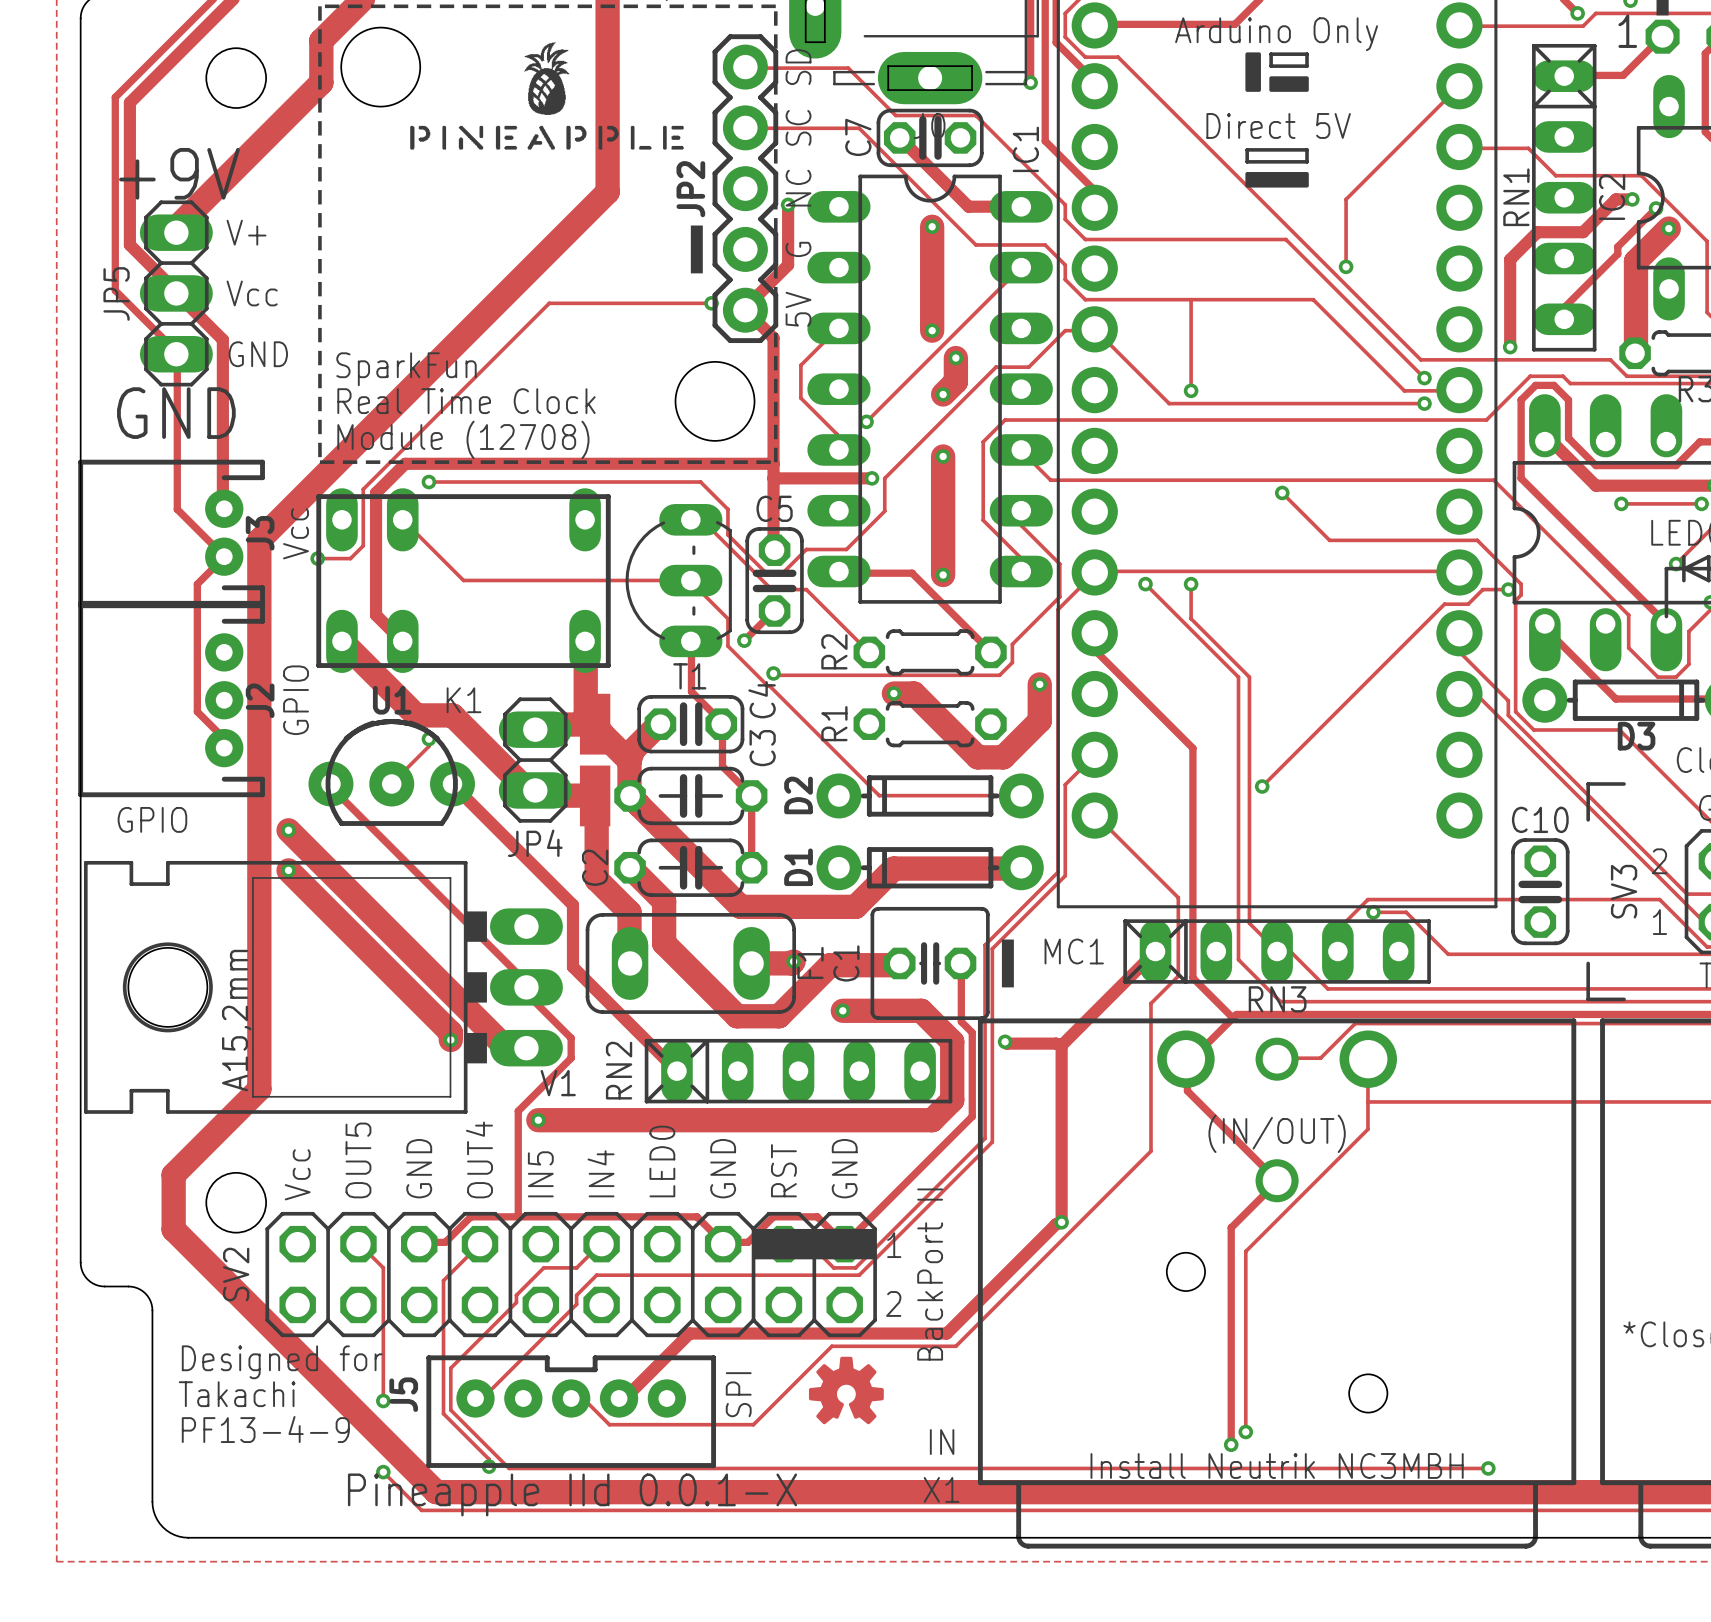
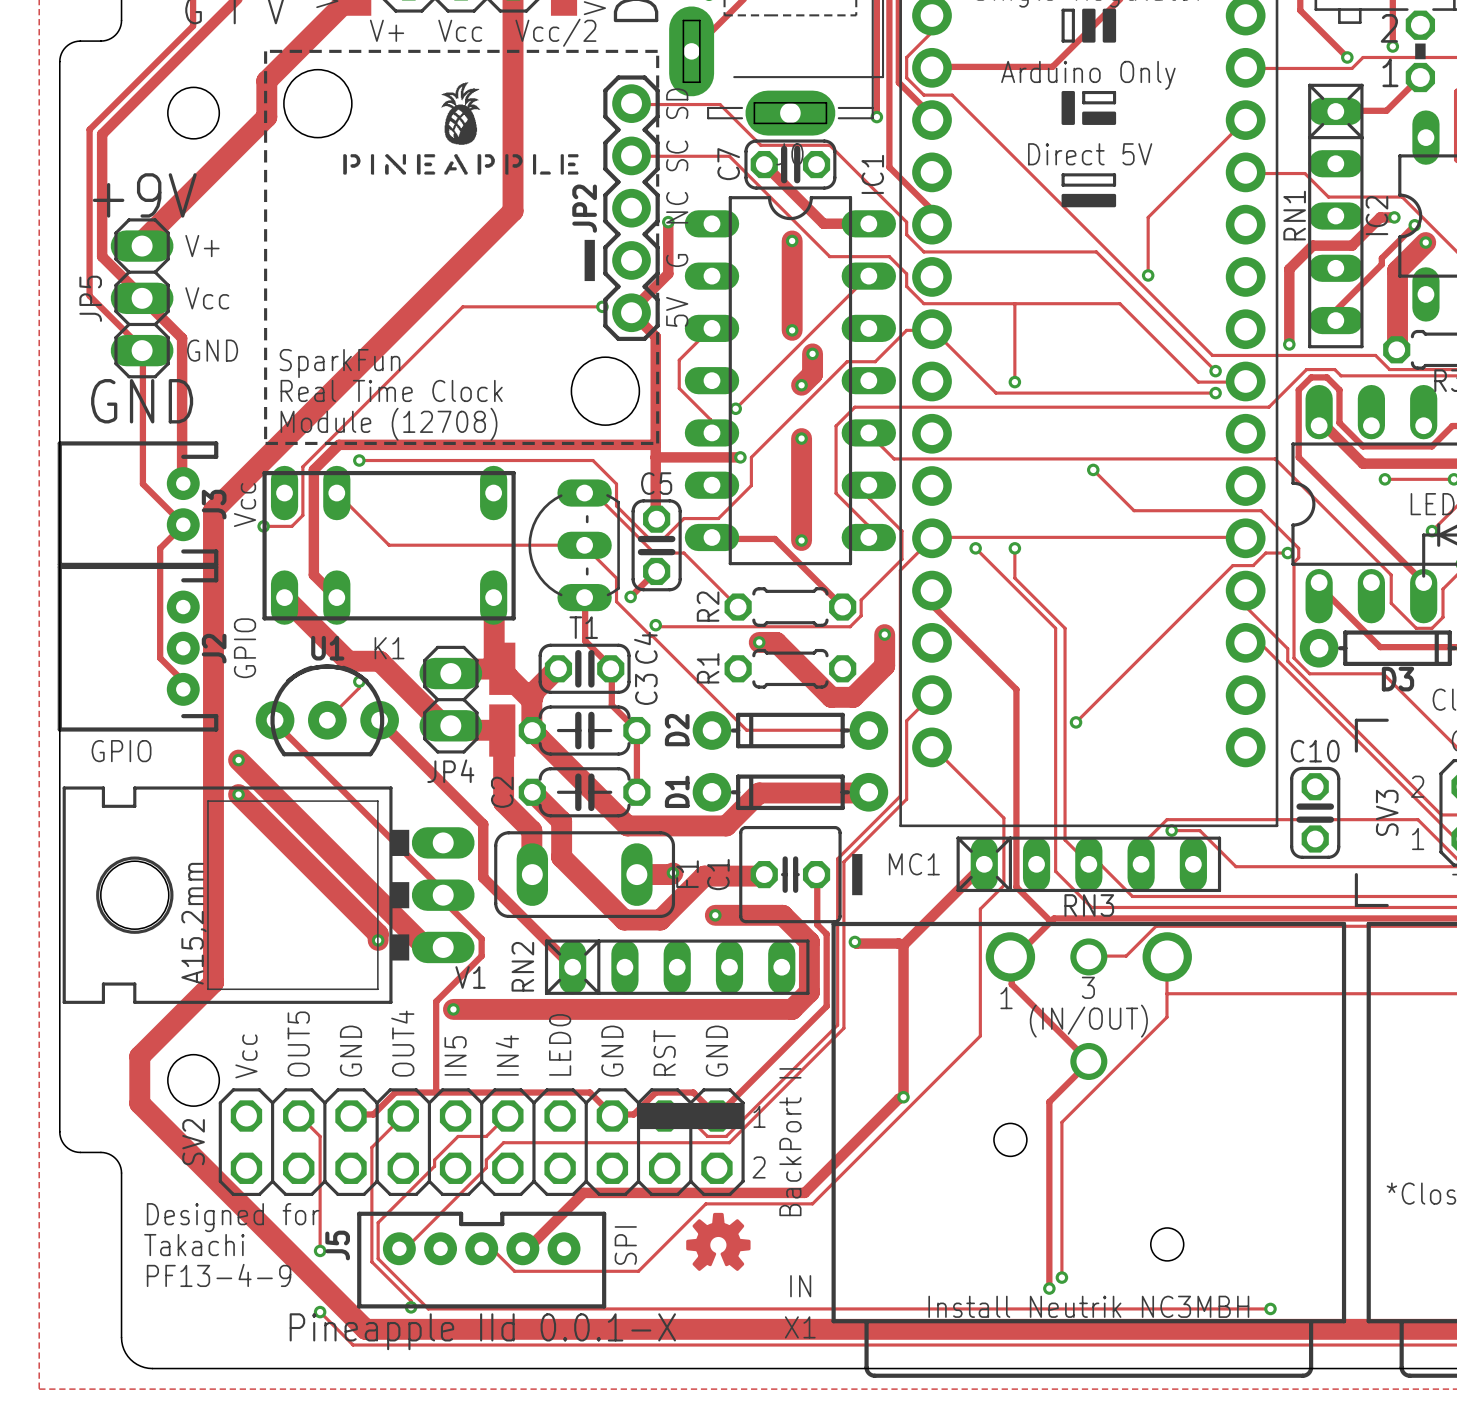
text: none -> 3 (1088, 987)
text: none -> 1 (1006, 998)

